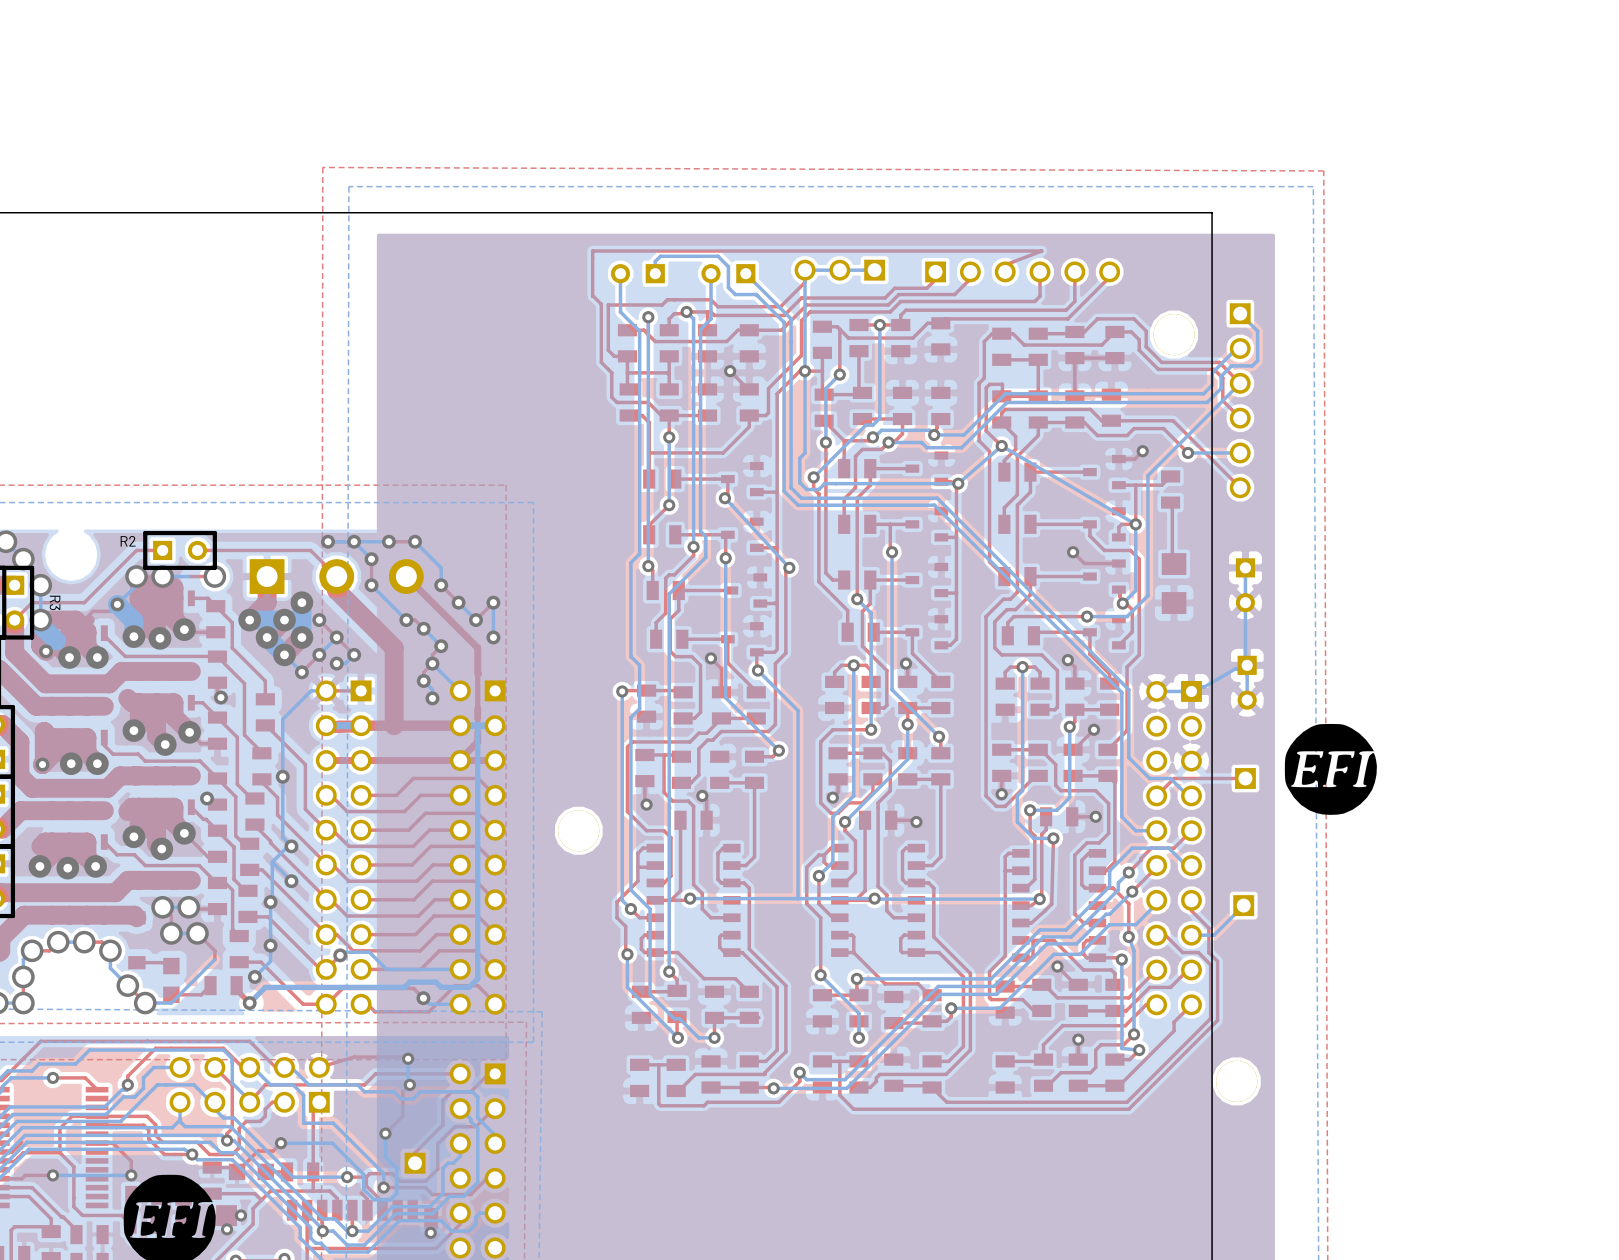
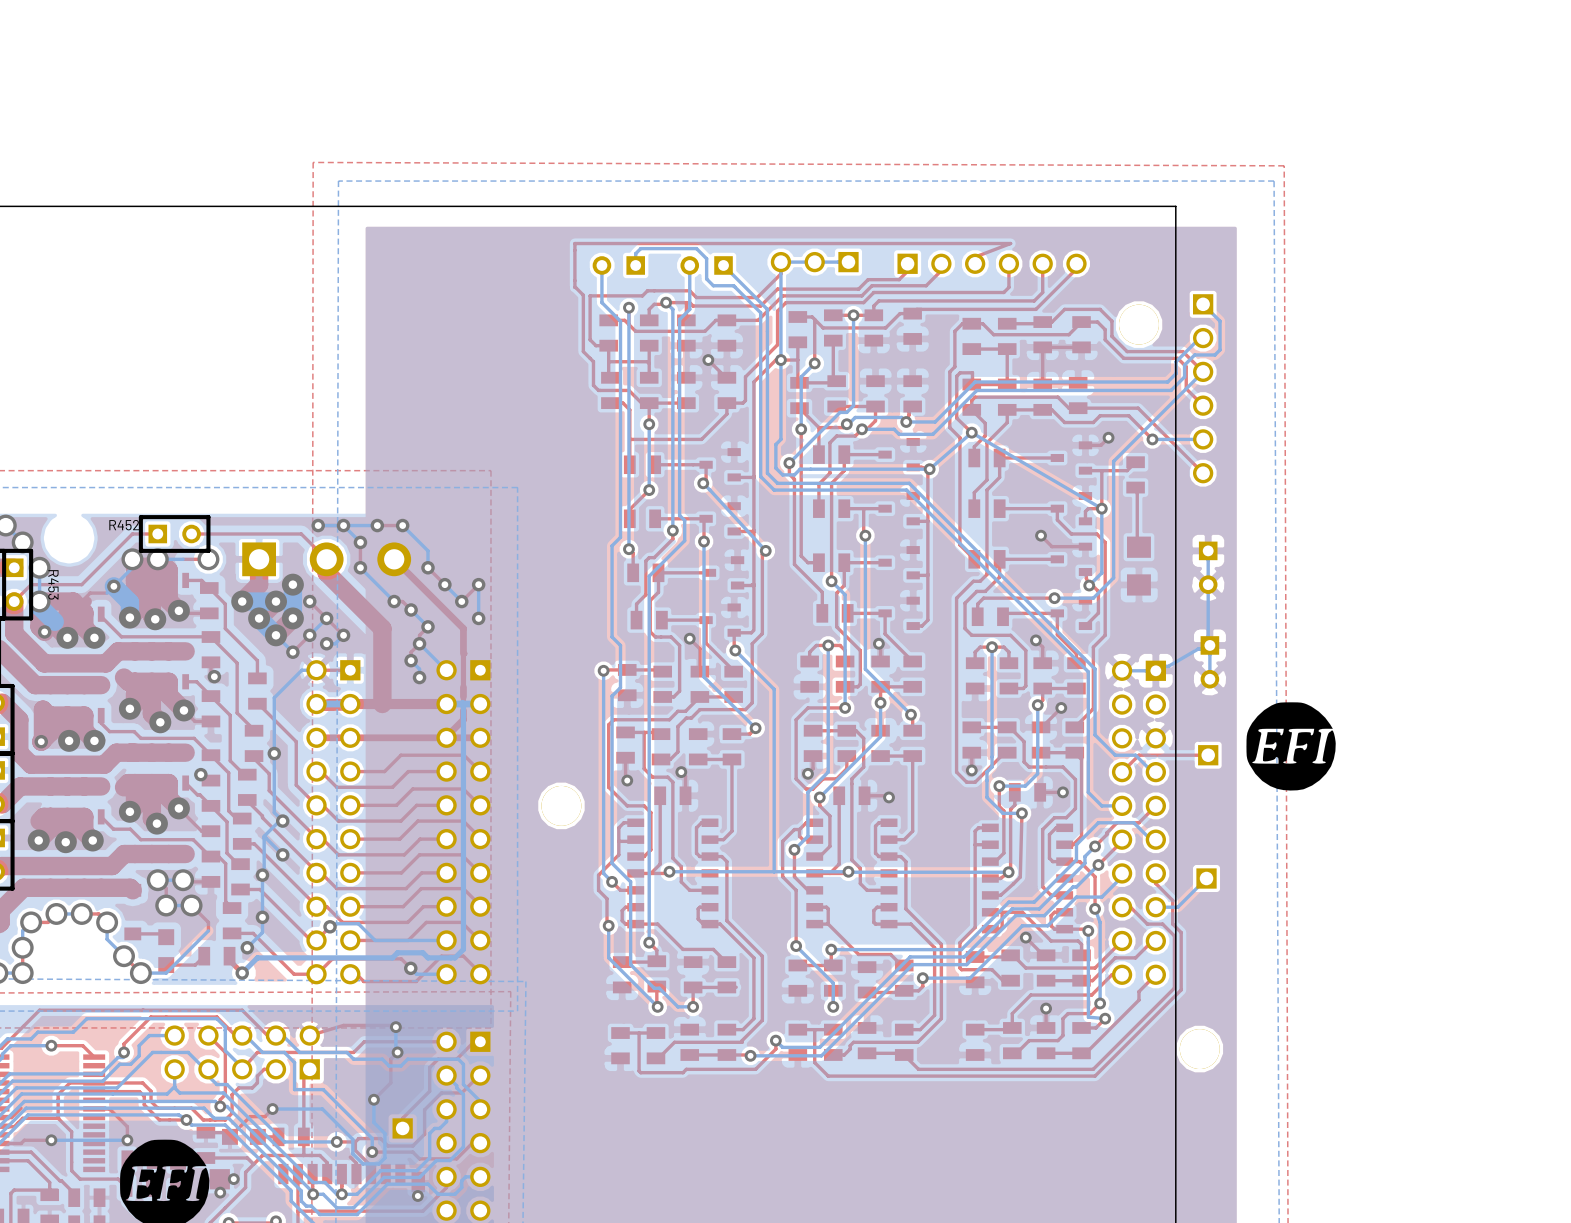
R2 name: R2 (128, 541) -> R452 (124, 525)
R3 name: R3 (55, 602) -> R453 (53, 584)

